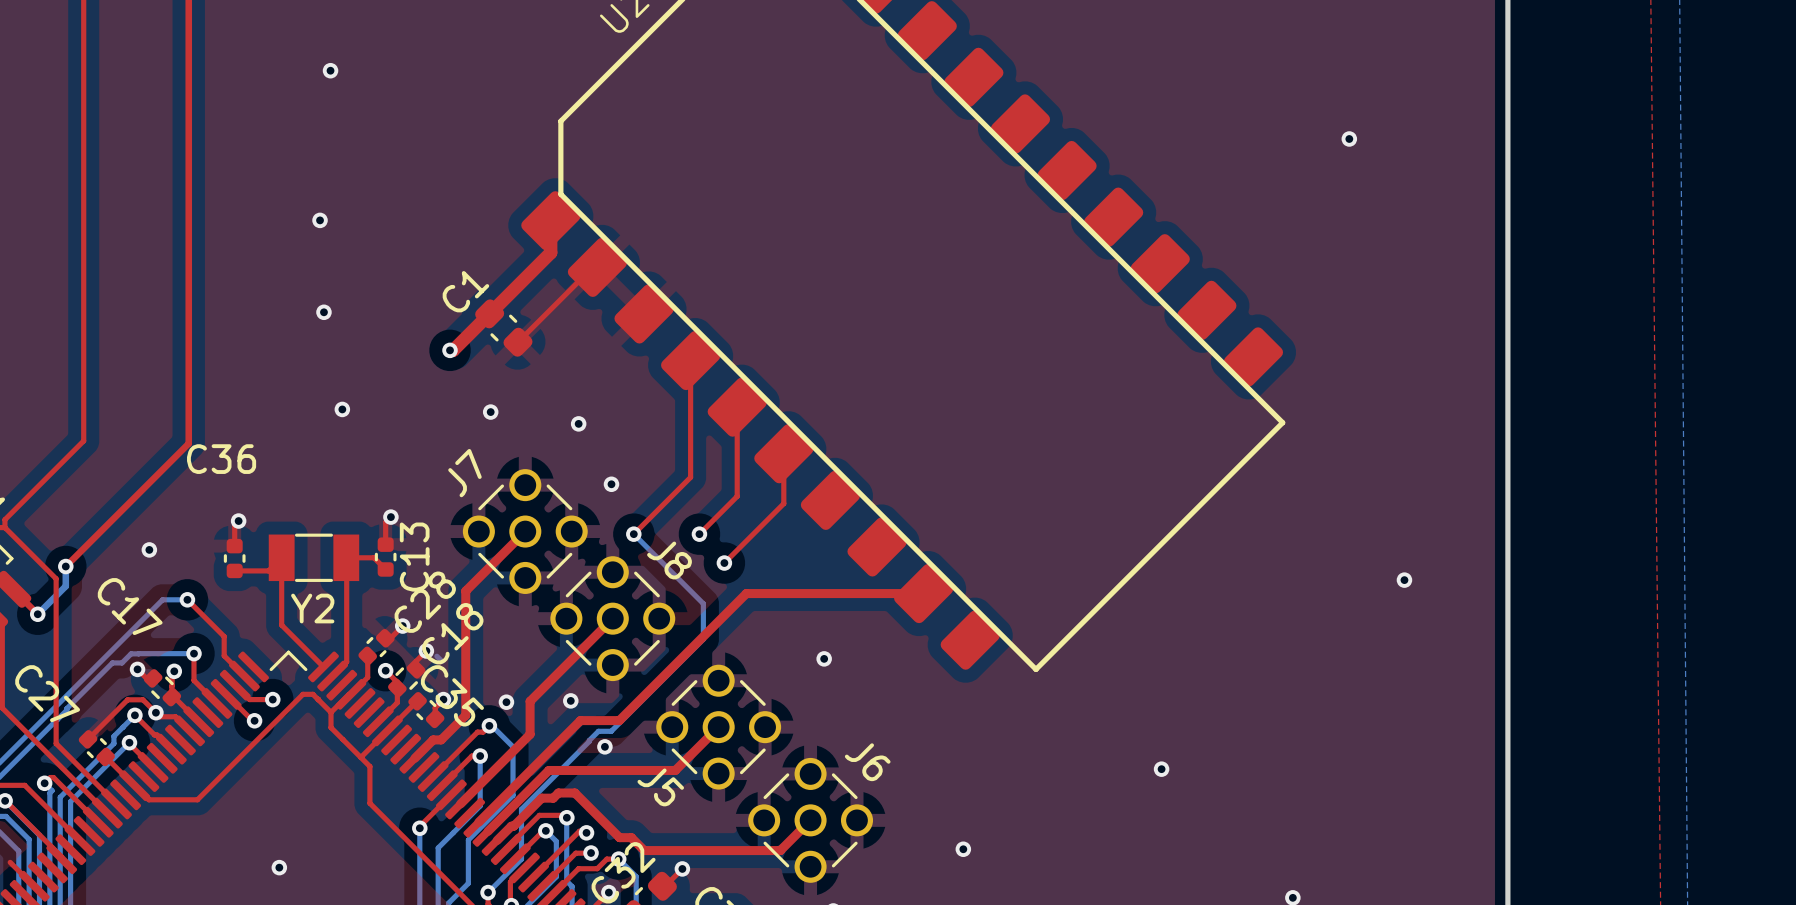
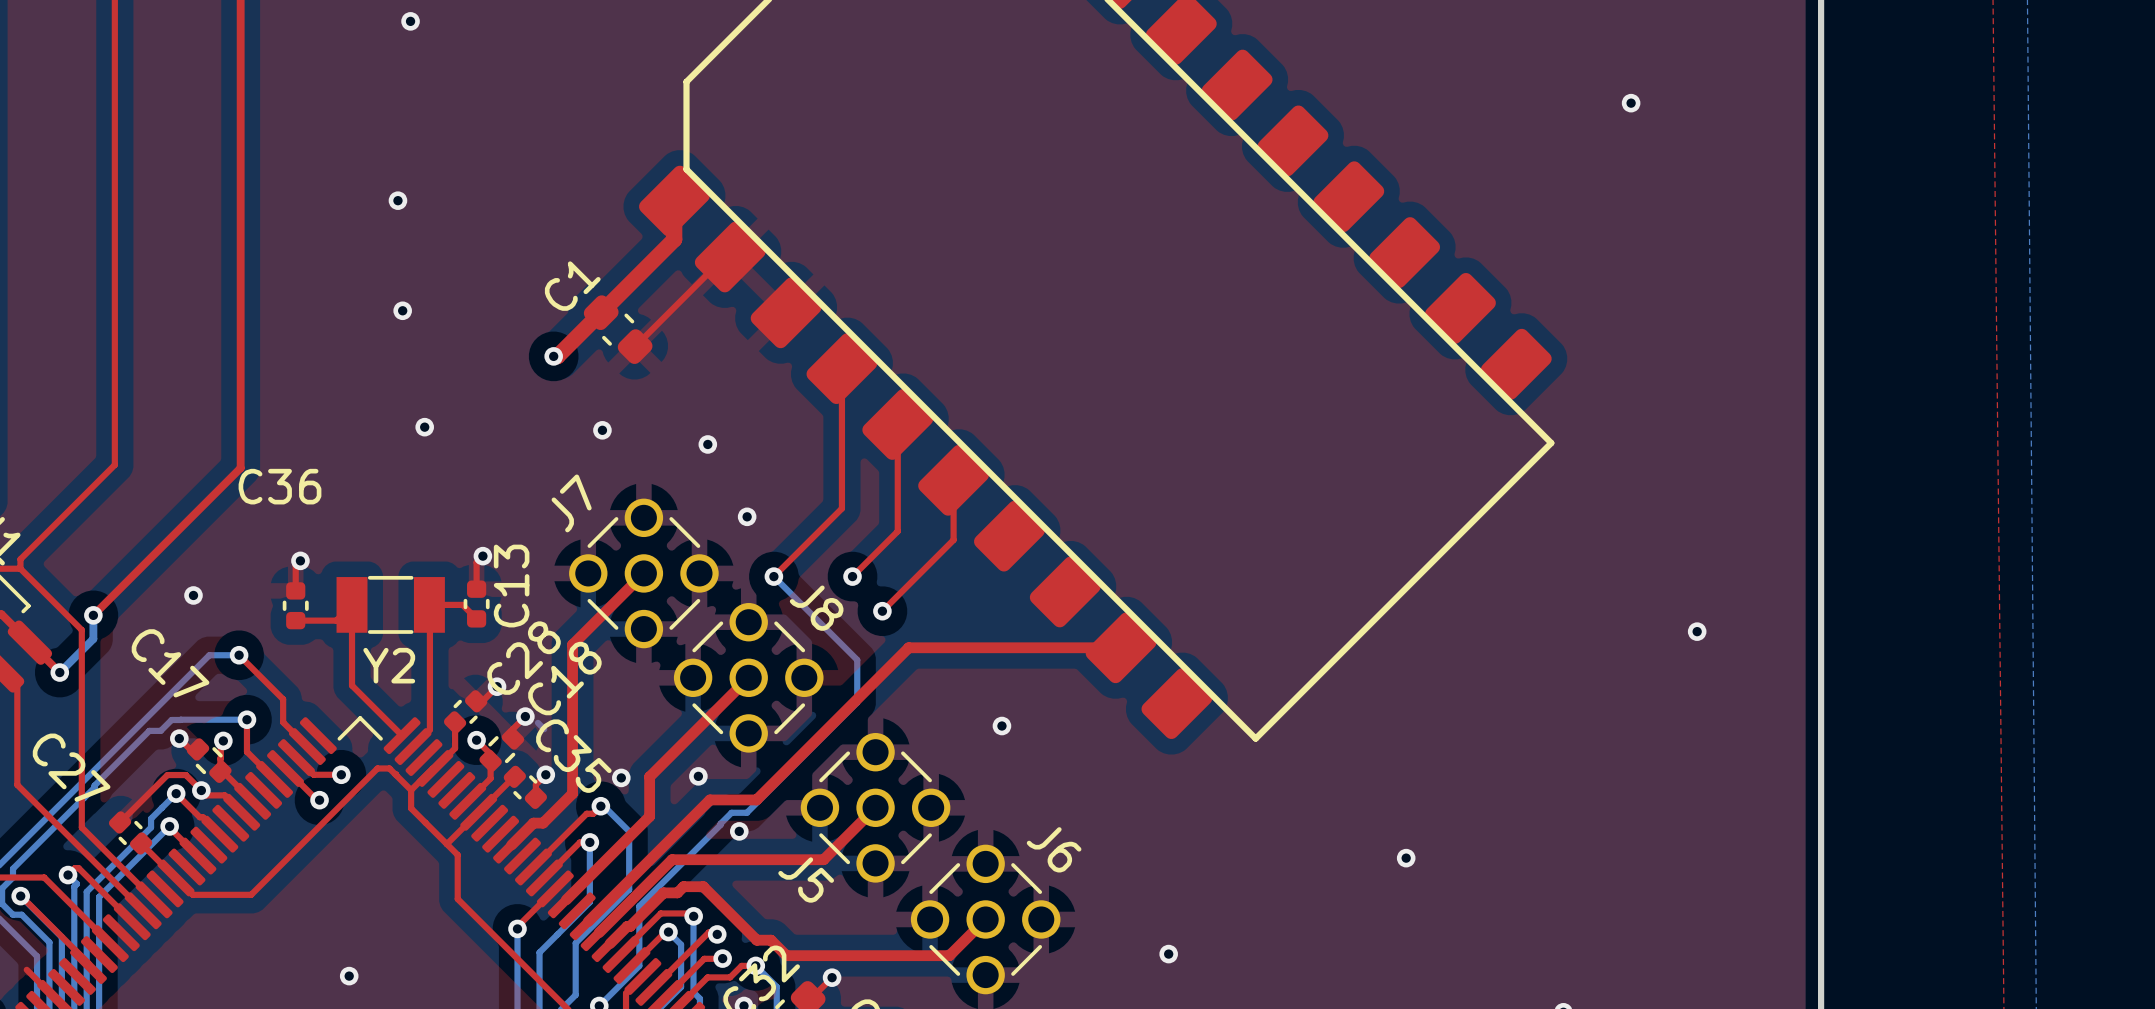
C13 name position: C13 (414, 557) -> C13 (511, 586)
C18 name position: C18 (452, 633) -> C18 (564, 678)
C35 name position: C35 (452, 695) -> C35 (573, 756)

